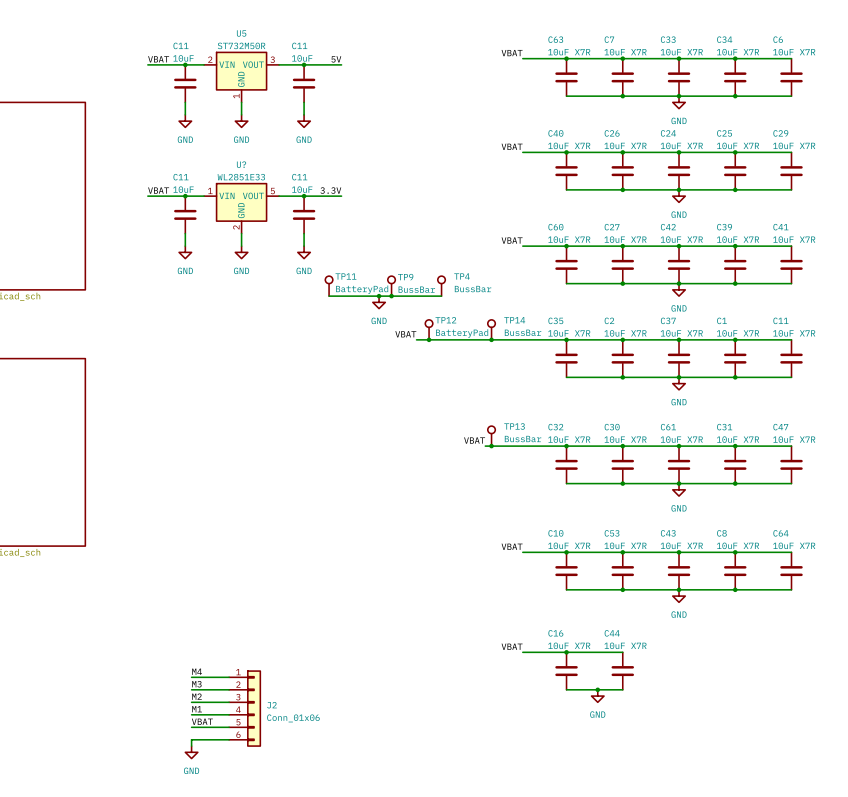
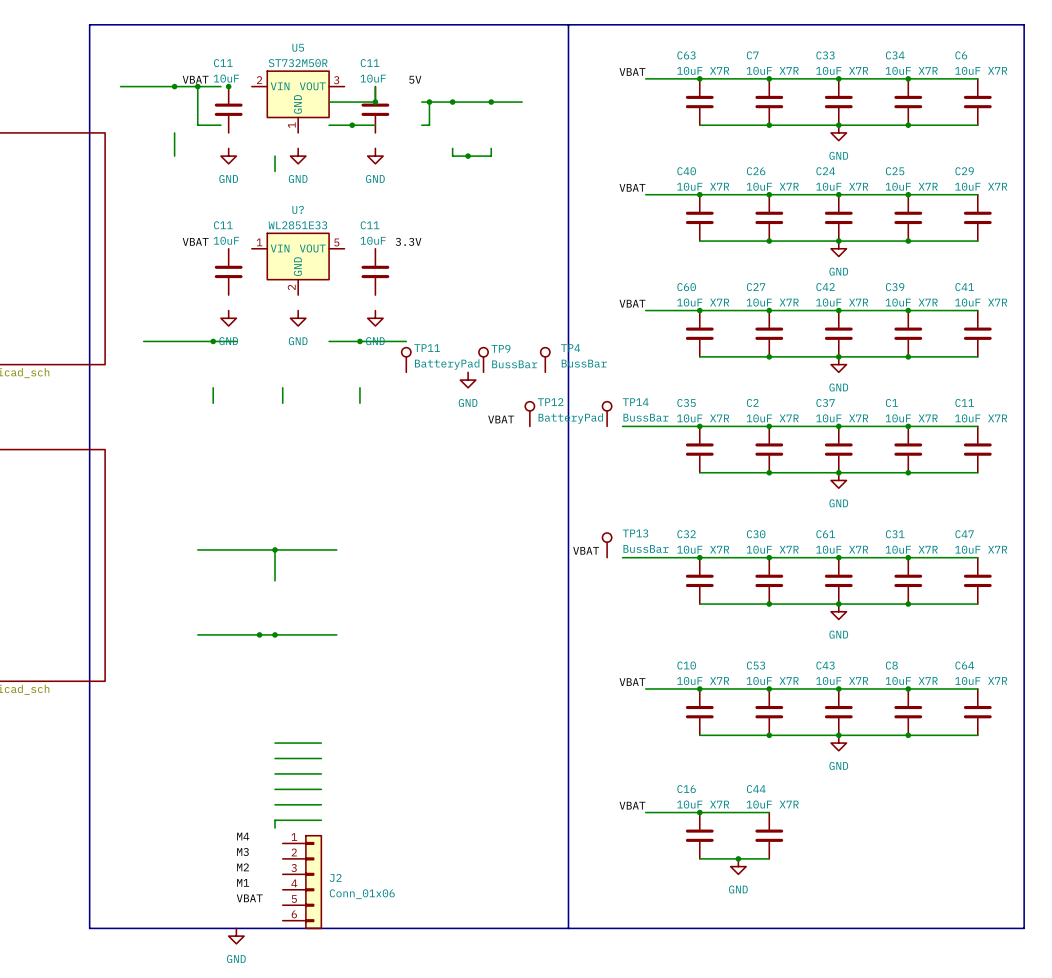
line: none -> (89, 24) (1024, 24) (1024, 928) (89, 928) (89, 24)
line: none -> (568, 24) (568, 928)
wire: none -> (120, 86) (182, 86)
junction: none -> (174, 86)
wire: none -> (197, 86) (197, 125) (220, 125)
junction: none -> (197, 86)
wire: (179, 64) (204, 64) -> none
wire: (279, 64) (341, 64) -> none
wire: none -> (375, 86) (375, 102) (329, 102)
junction position: (304, 64) -> (375, 102)
wire: none -> (421, 102) (522, 102)
wire: none -> (429, 102) (429, 125) (421, 125)
junction: none -> (429, 102)
junction: none -> (452, 102)
junction: none -> (491, 102)
wire: none -> (329, 125) (375, 125)
junction: none -> (352, 125)
wire: none -> (174, 132) (174, 156)
wire: (185, 102) (185, 114) -> none
wire: (241, 102) (241, 114) -> (275, 156) (275, 171)
wire: (304, 102) (304, 114) -> none
wire: none -> (452, 148) (452, 156) (491, 156) (491, 148)
junction: none -> (468, 156)
wire: (147, 196) (204, 196) -> none
junction: (185, 196) -> none
wire: (279, 196) (341, 196) -> (329, 341) (406, 341)
junction: (304, 196) -> none
wire: (185, 233) (185, 246) -> (213, 387) (213, 403)
wire: (241, 233) (241, 246) -> (282, 387) (282, 403)
wire: (304, 233) (304, 246) -> (359, 387) (359, 403)
wire: none -> (143, 341) (236, 341)
junction: none -> (213, 341)
junction: none -> (359, 341)
wire: (329, 296) (441, 296) -> none
junction: (379, 296) -> none
junction: (391, 296) -> none
wire: (416, 339) (504, 339) -> none
junction: (429, 339) -> none
junction: (491, 339) -> none
wire: none -> (197, 549) (336, 549)
wire: none -> (275, 549) (275, 580)
junction: none -> (275, 549)
wire: (485, 446) (504, 446) -> none
junction: (491, 446) -> none
wire: none -> (197, 634) (336, 634)
junction: none -> (259, 634)
junction: none -> (275, 634)
wire: (191, 677) (229, 677) -> (275, 743) (321, 743)
wire: (191, 689) (229, 689) -> (275, 758) (321, 758)
wire: (191, 702) (229, 702) -> (275, 773) (321, 773)
wire: (191, 714) (229, 714) -> (275, 789) (321, 789)
wire: (191, 727) (229, 727) -> (275, 804) (321, 804)
wire: (229, 739) (191, 739) (191, 746) -> (321, 820) (275, 820) (275, 828)

